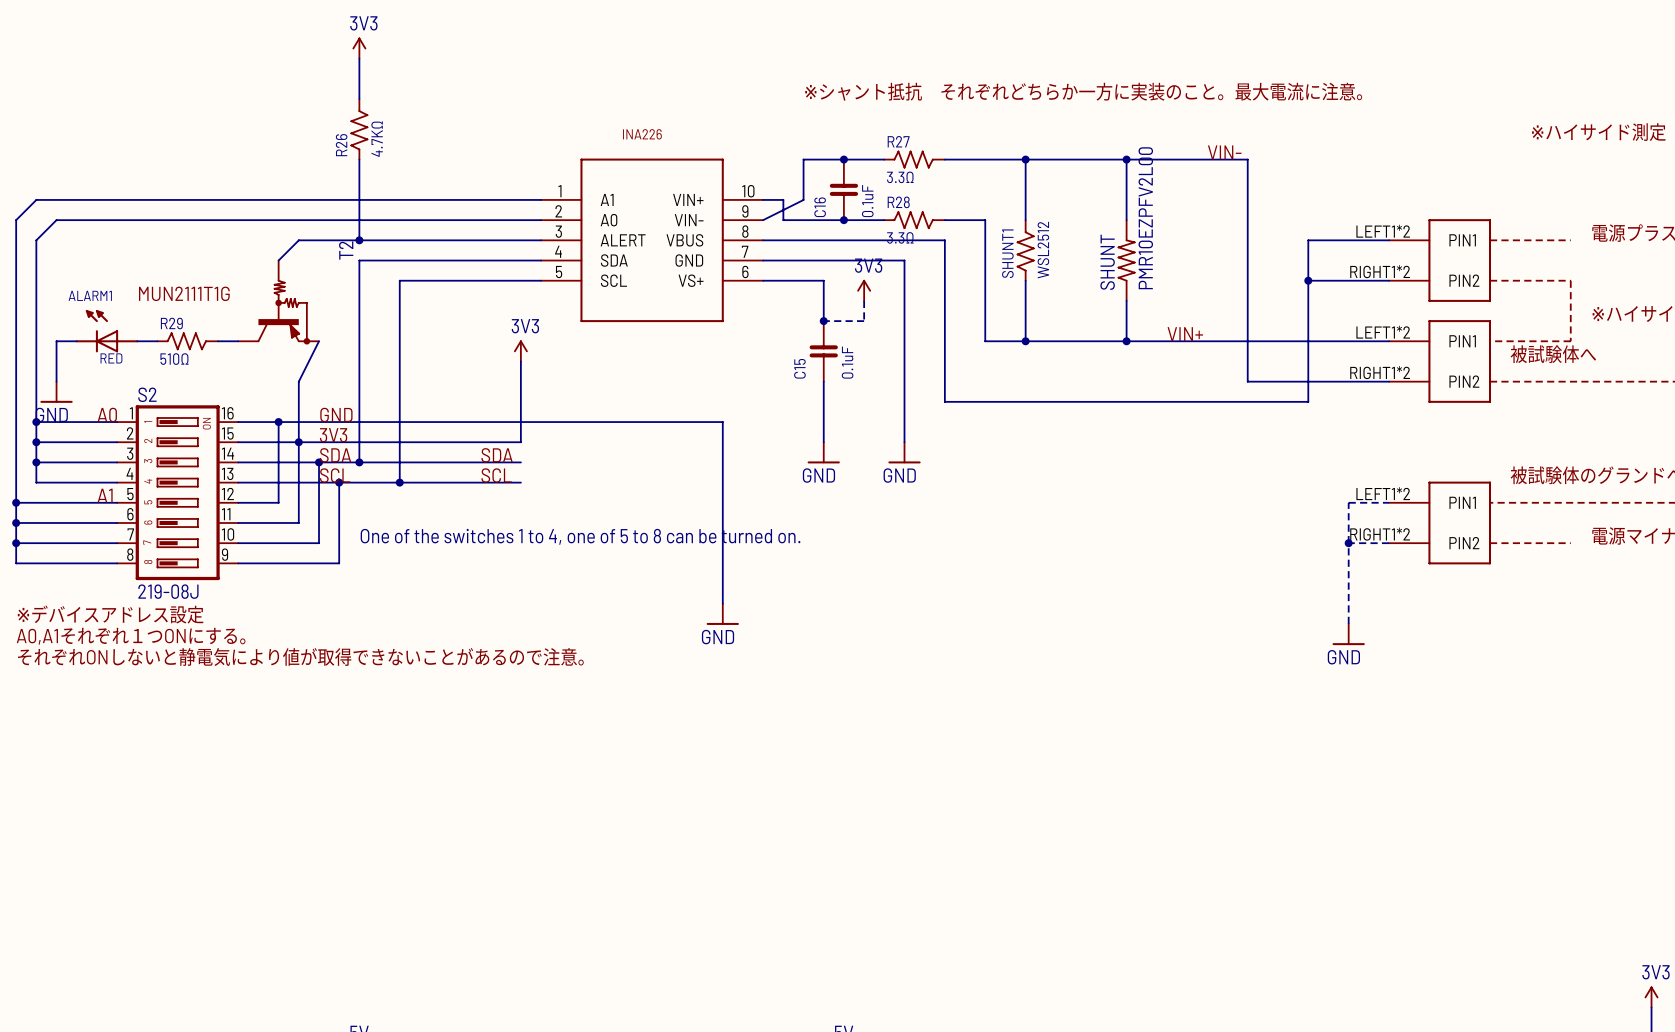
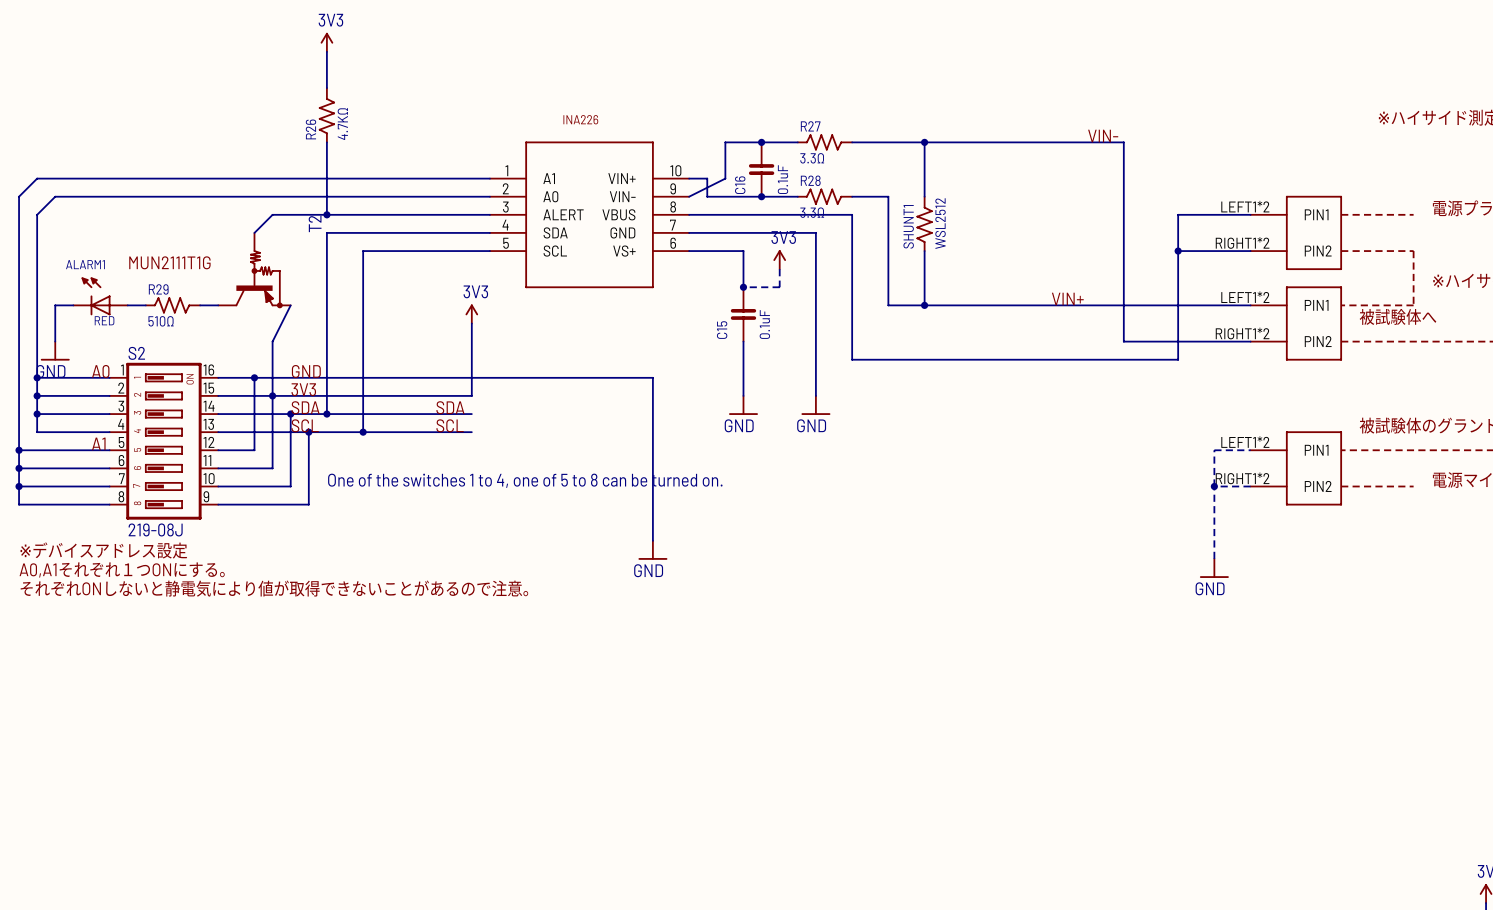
text: ※シャント抵抗 それぞれどちらか一方に実装のこと。最大電流に注意。 (1083, 91) -> none
wire: (1126, 159) (1126, 220) -> none
junction: (1126, 159) -> none
SHUNT: PMR10EZPFV2L00 (1126, 260) -> none
wire: (1126, 300) (1126, 341) -> none
junction: (1126, 341) -> none

